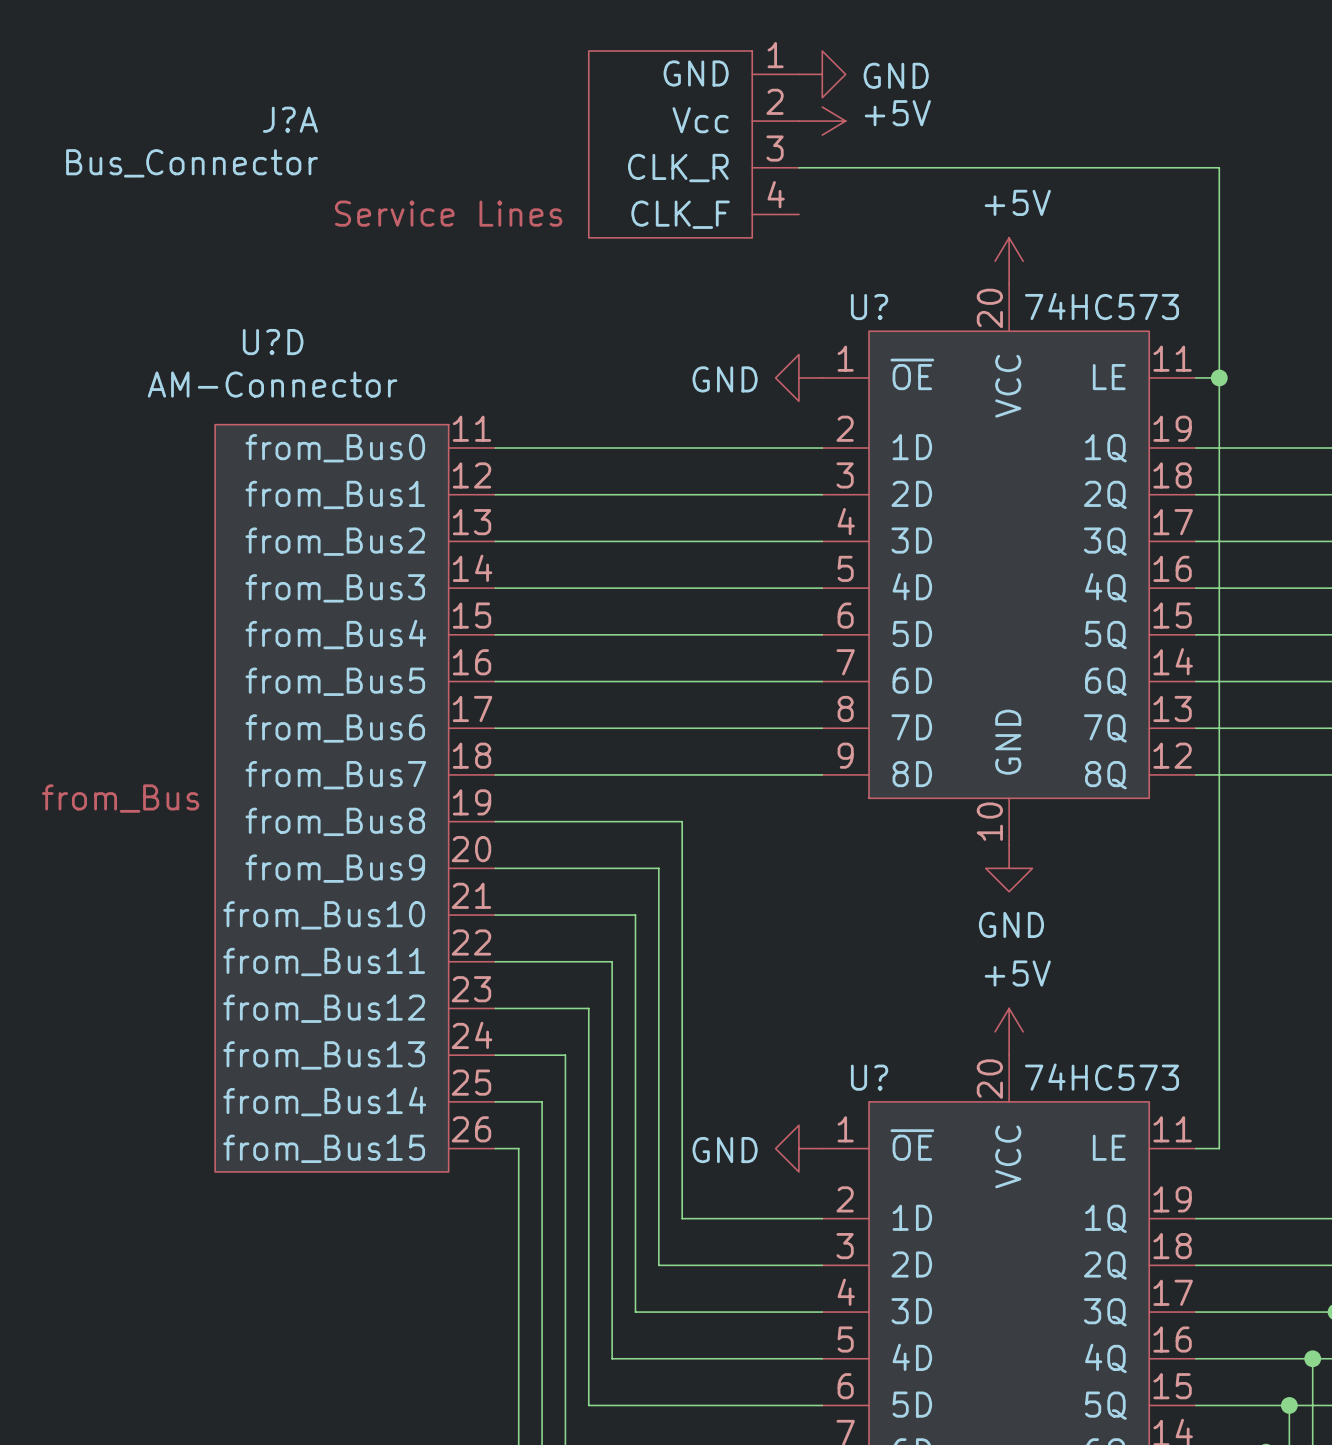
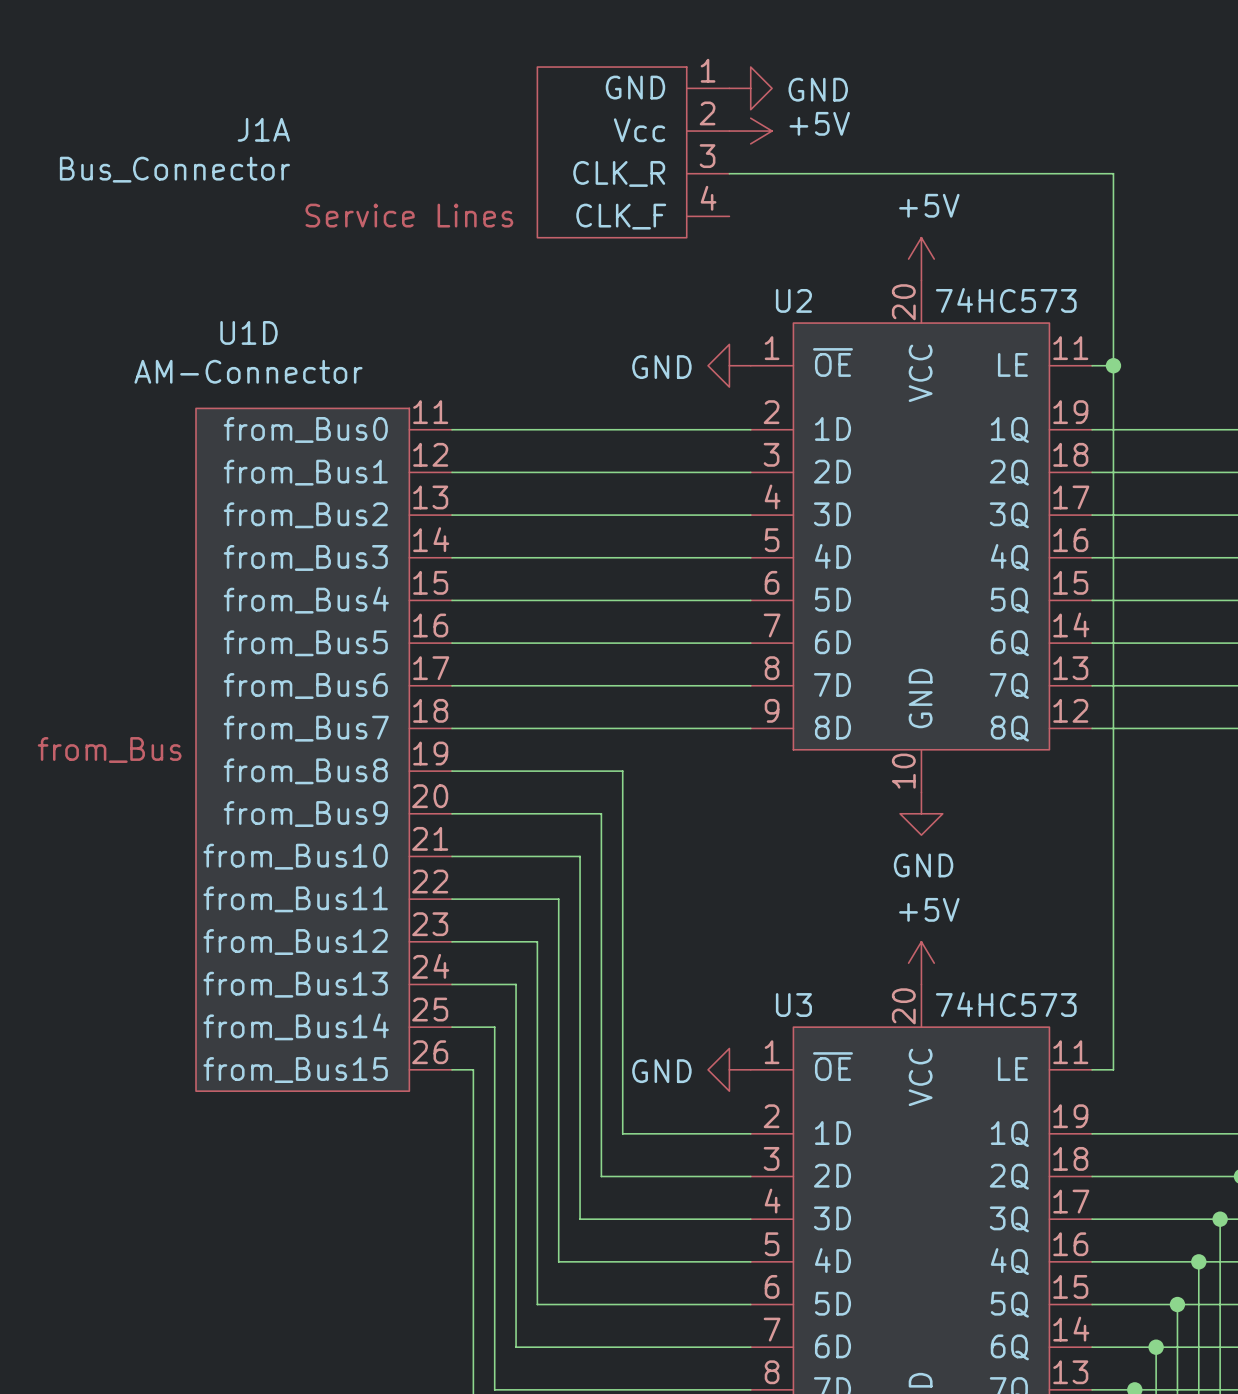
J?A name: J?A (290, 119) -> J1A (263, 129)
U? name: U? (869, 307) -> U2 (793, 300)
U?D name: U?D (273, 342) -> U1D (249, 332)
U? name: U? (869, 1077) -> U3 (793, 1005)

